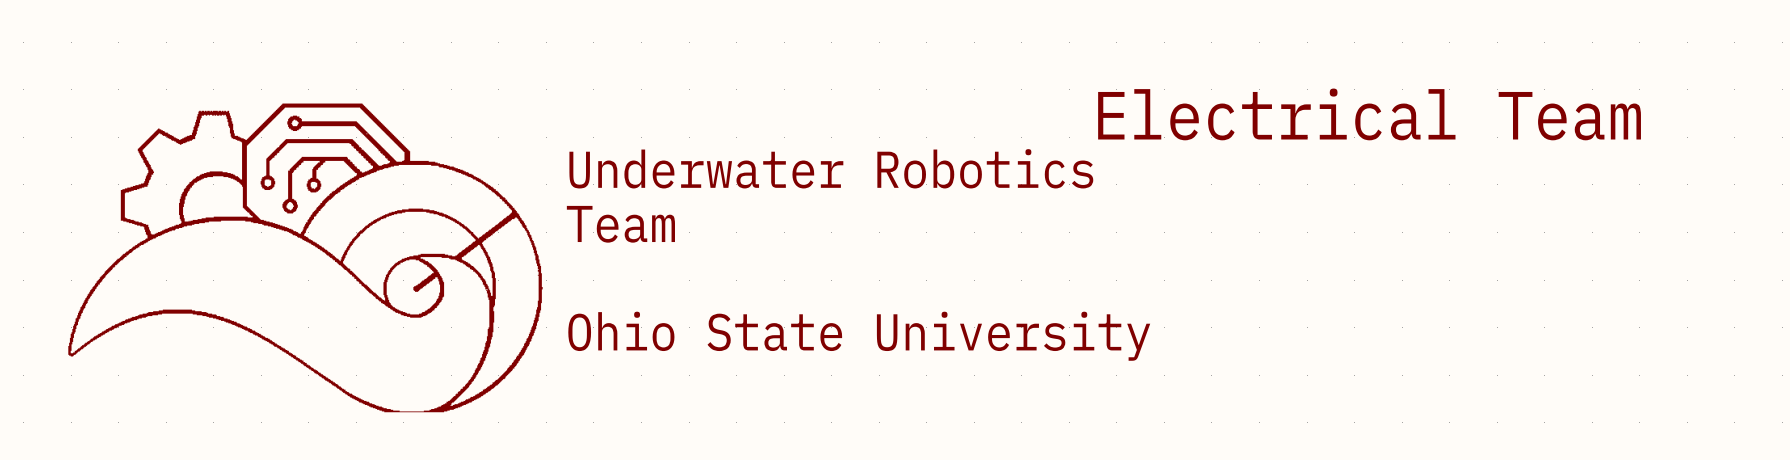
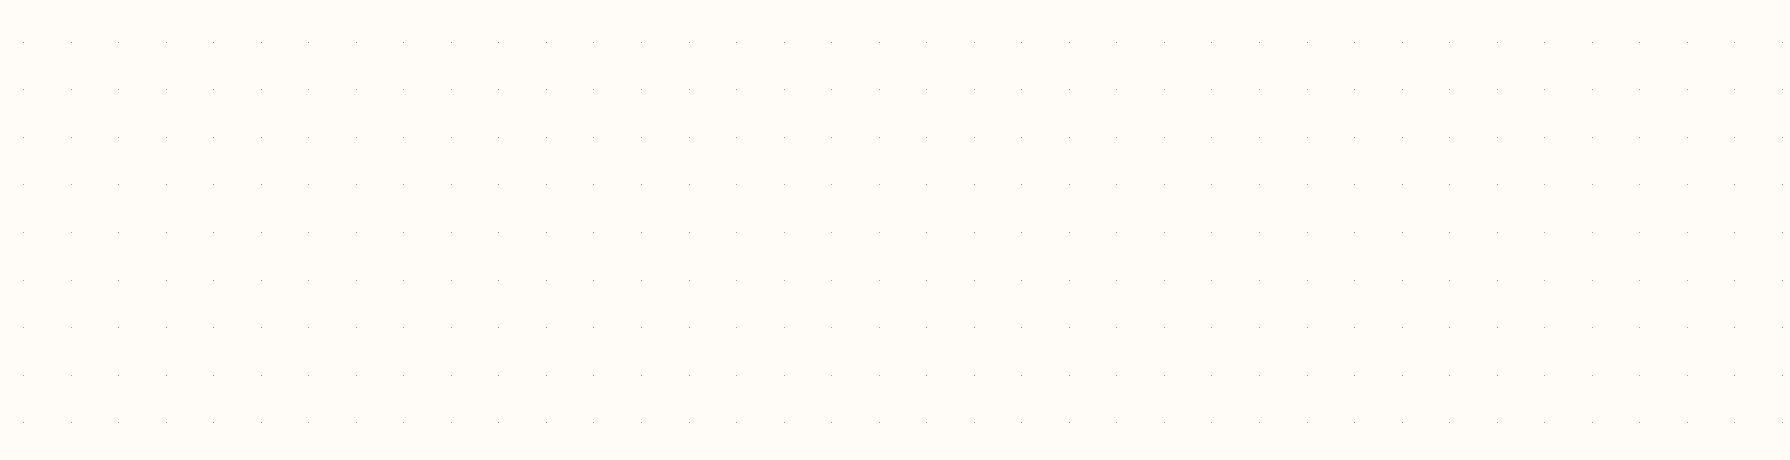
drawing: [68, 103, 543, 413] -> none
text: Electrical Team (1369, 114) -> none
text: Underwater Robotics (831, 168) -> none
text: Team (620, 224) -> none
text: Ohio State University (859, 336) -> none

